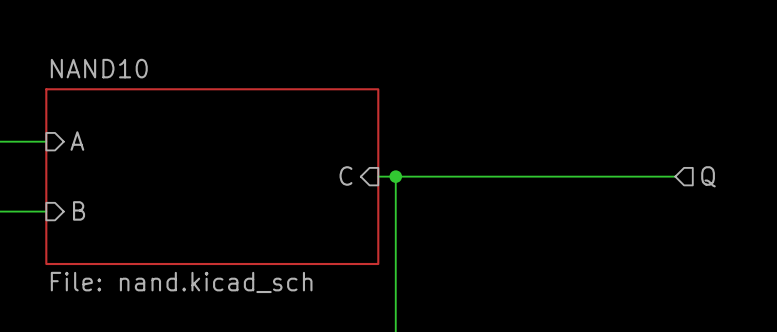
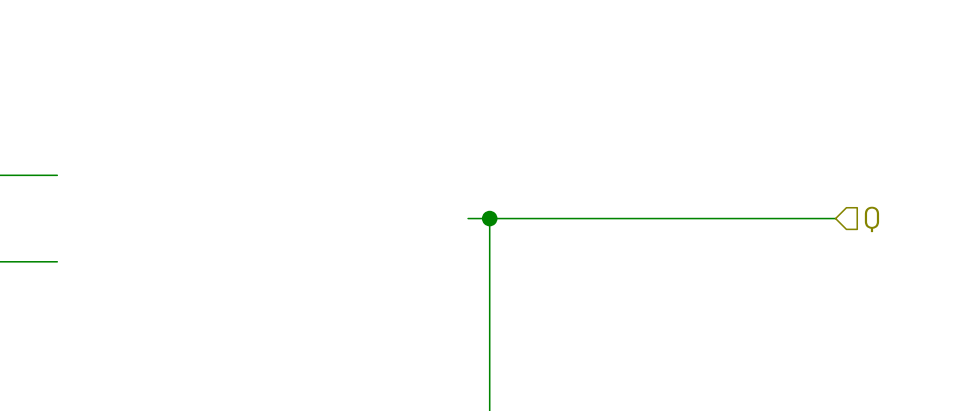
sheet pin: A (77, 141) -> none
sheet pin: C (345, 175) -> none
sheet NAND10: File: nand.kicad_sch (212, 176) -> none
sheet pin: B (79, 210) -> none

